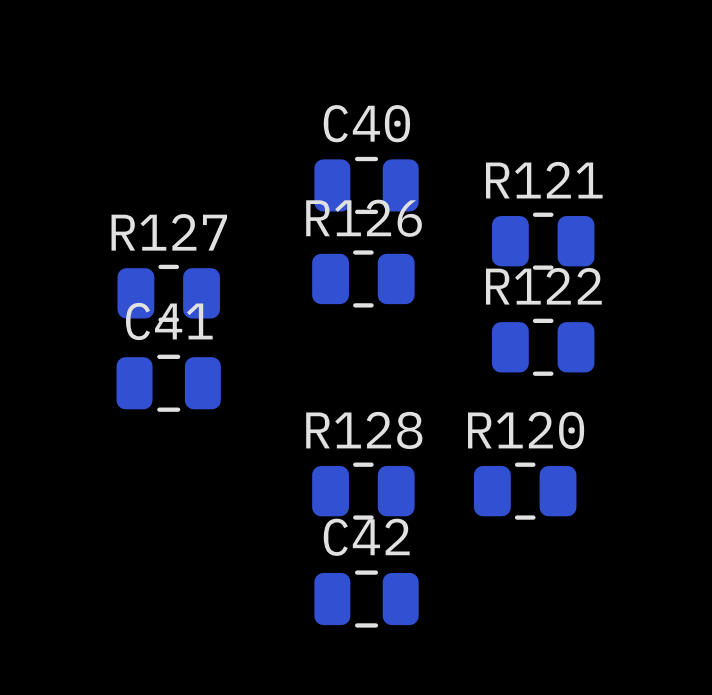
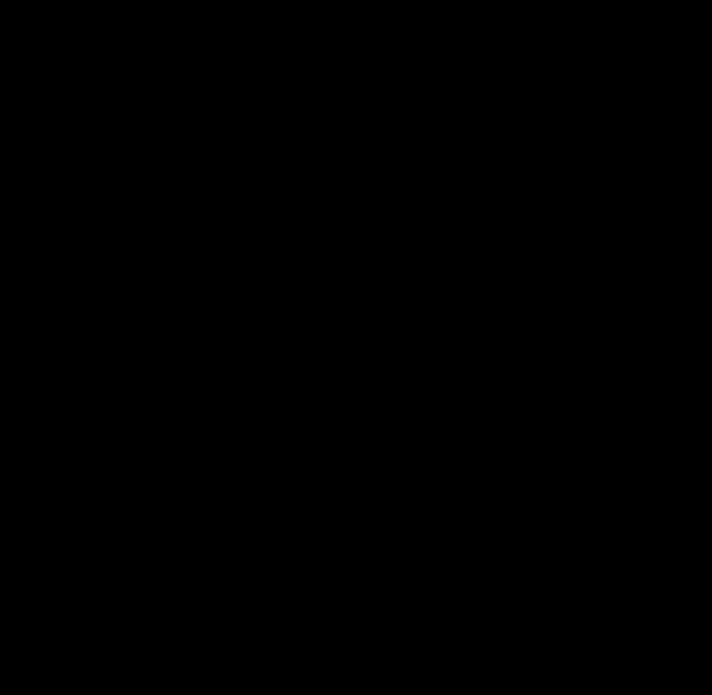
C40: (366, 185) -> none
R121: (543, 241) -> none
R126: (363, 278) -> none
R127: (168, 293) -> none
R122: (543, 347) -> none
C41: (168, 383) -> none
R128: (363, 491) -> none
R120: (525, 491) -> none
C42: (366, 599) -> none

